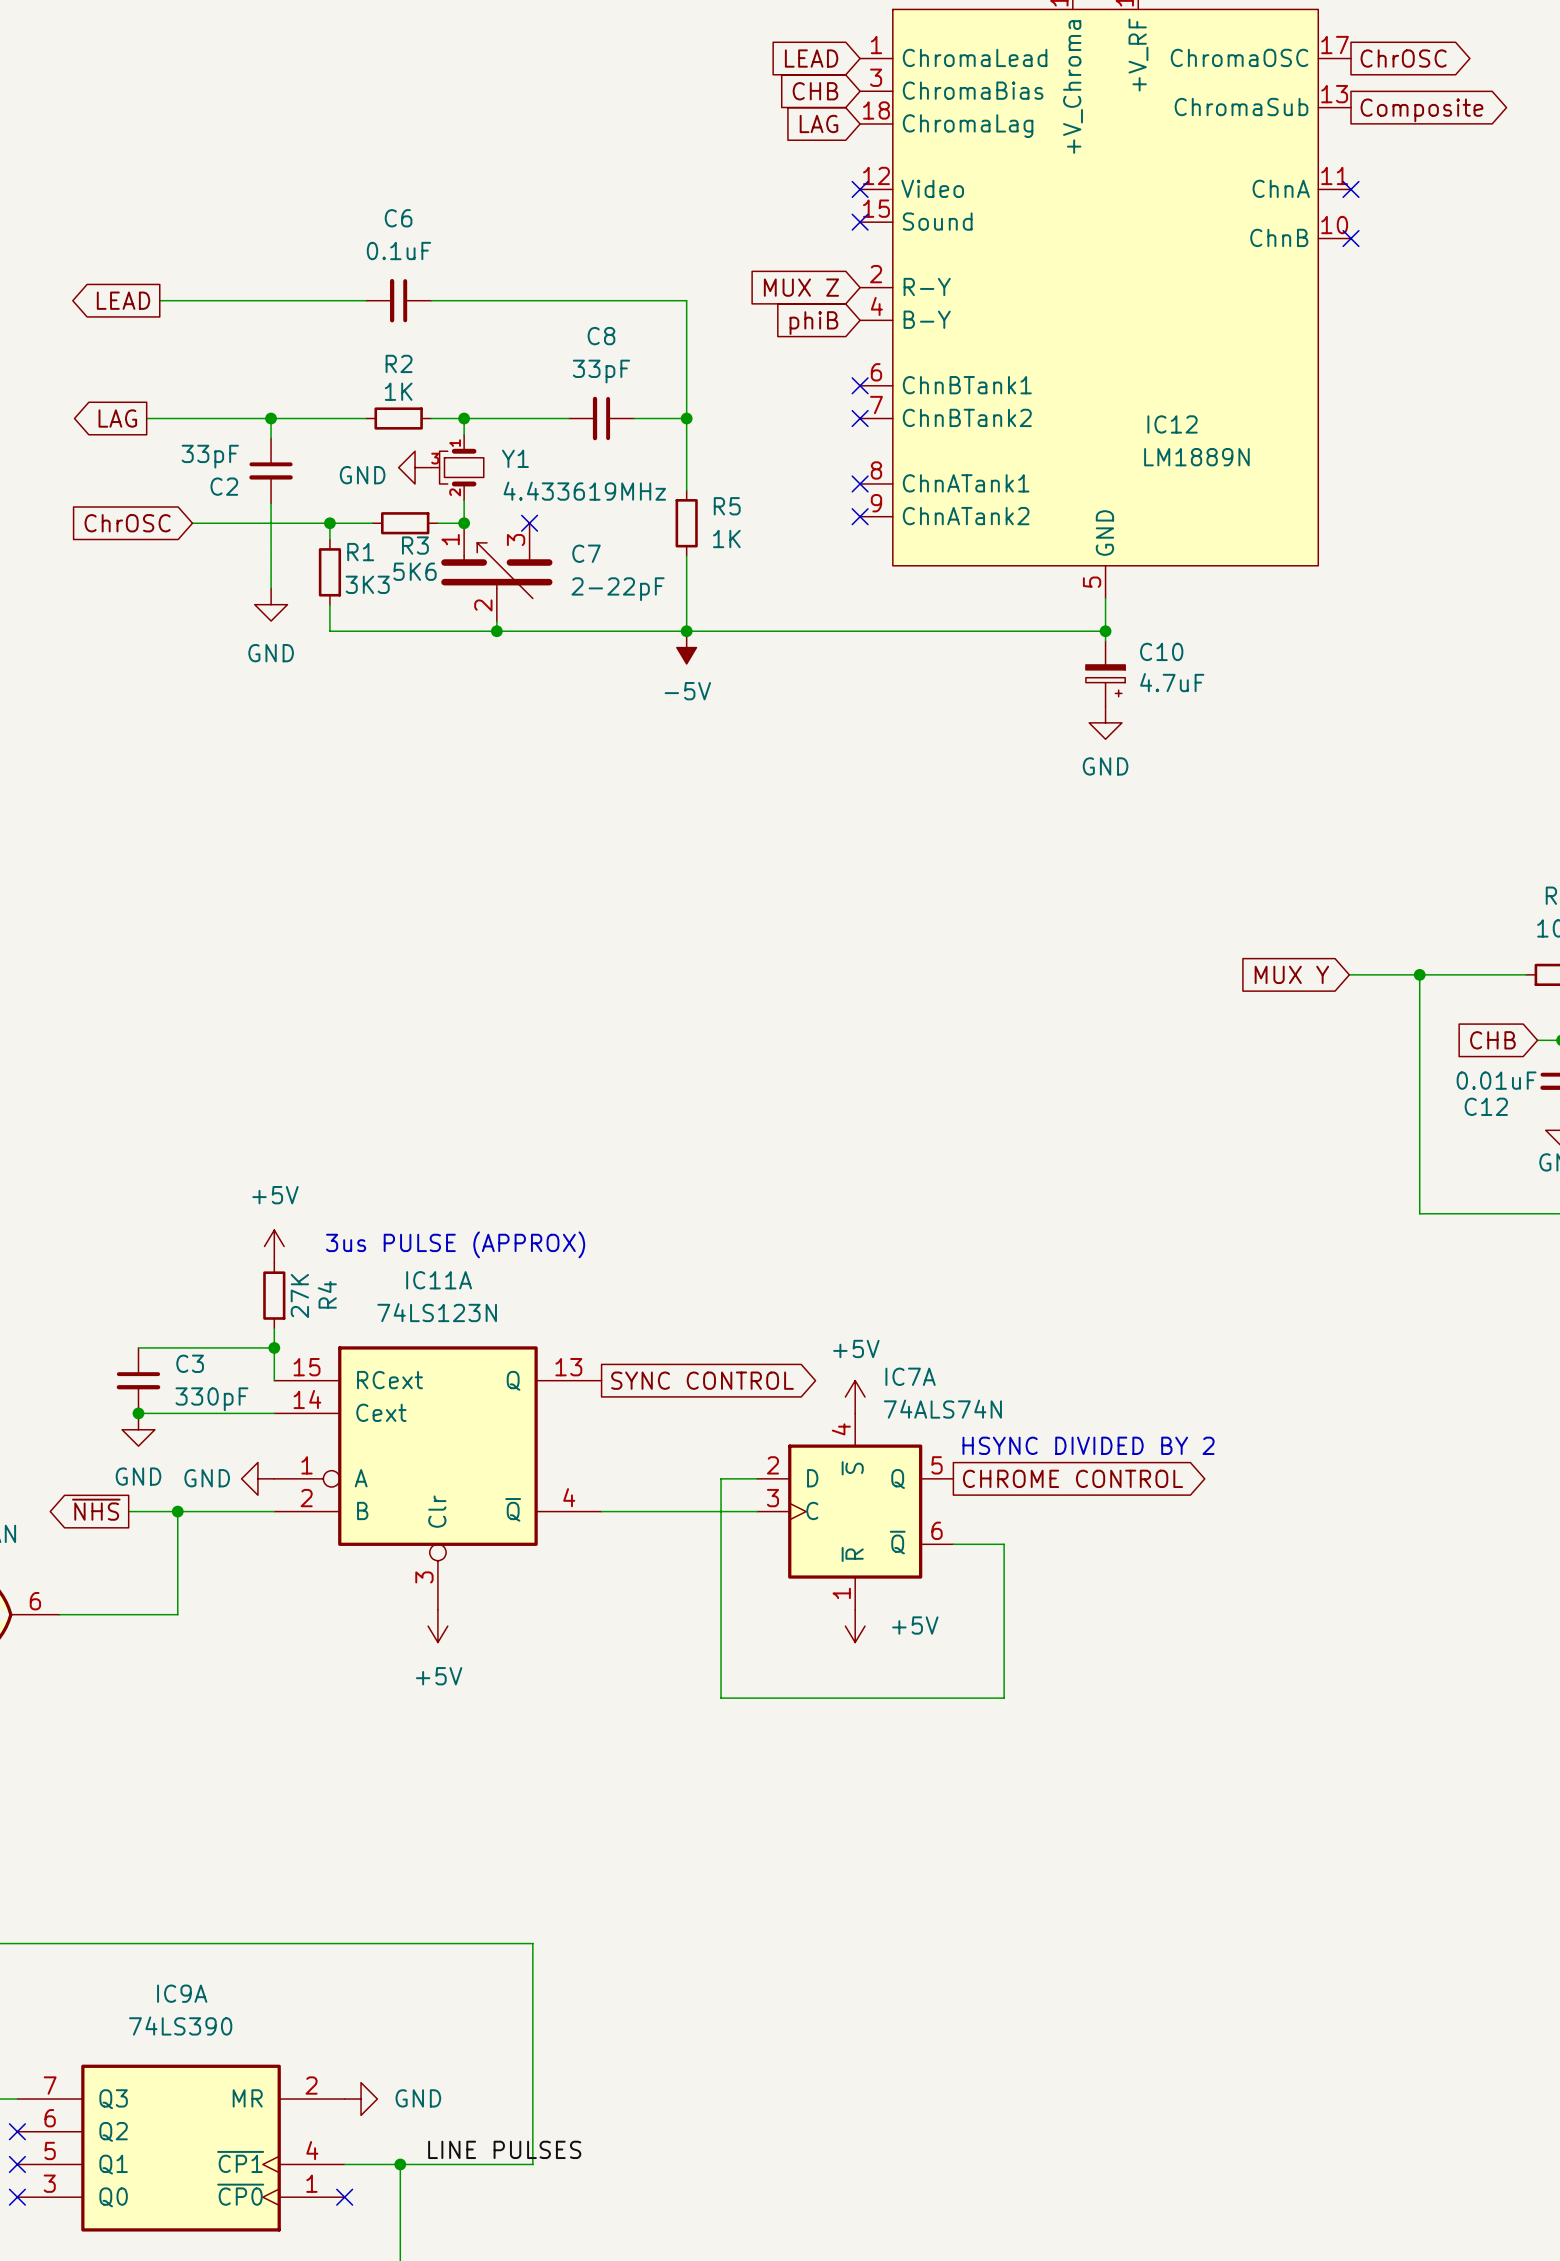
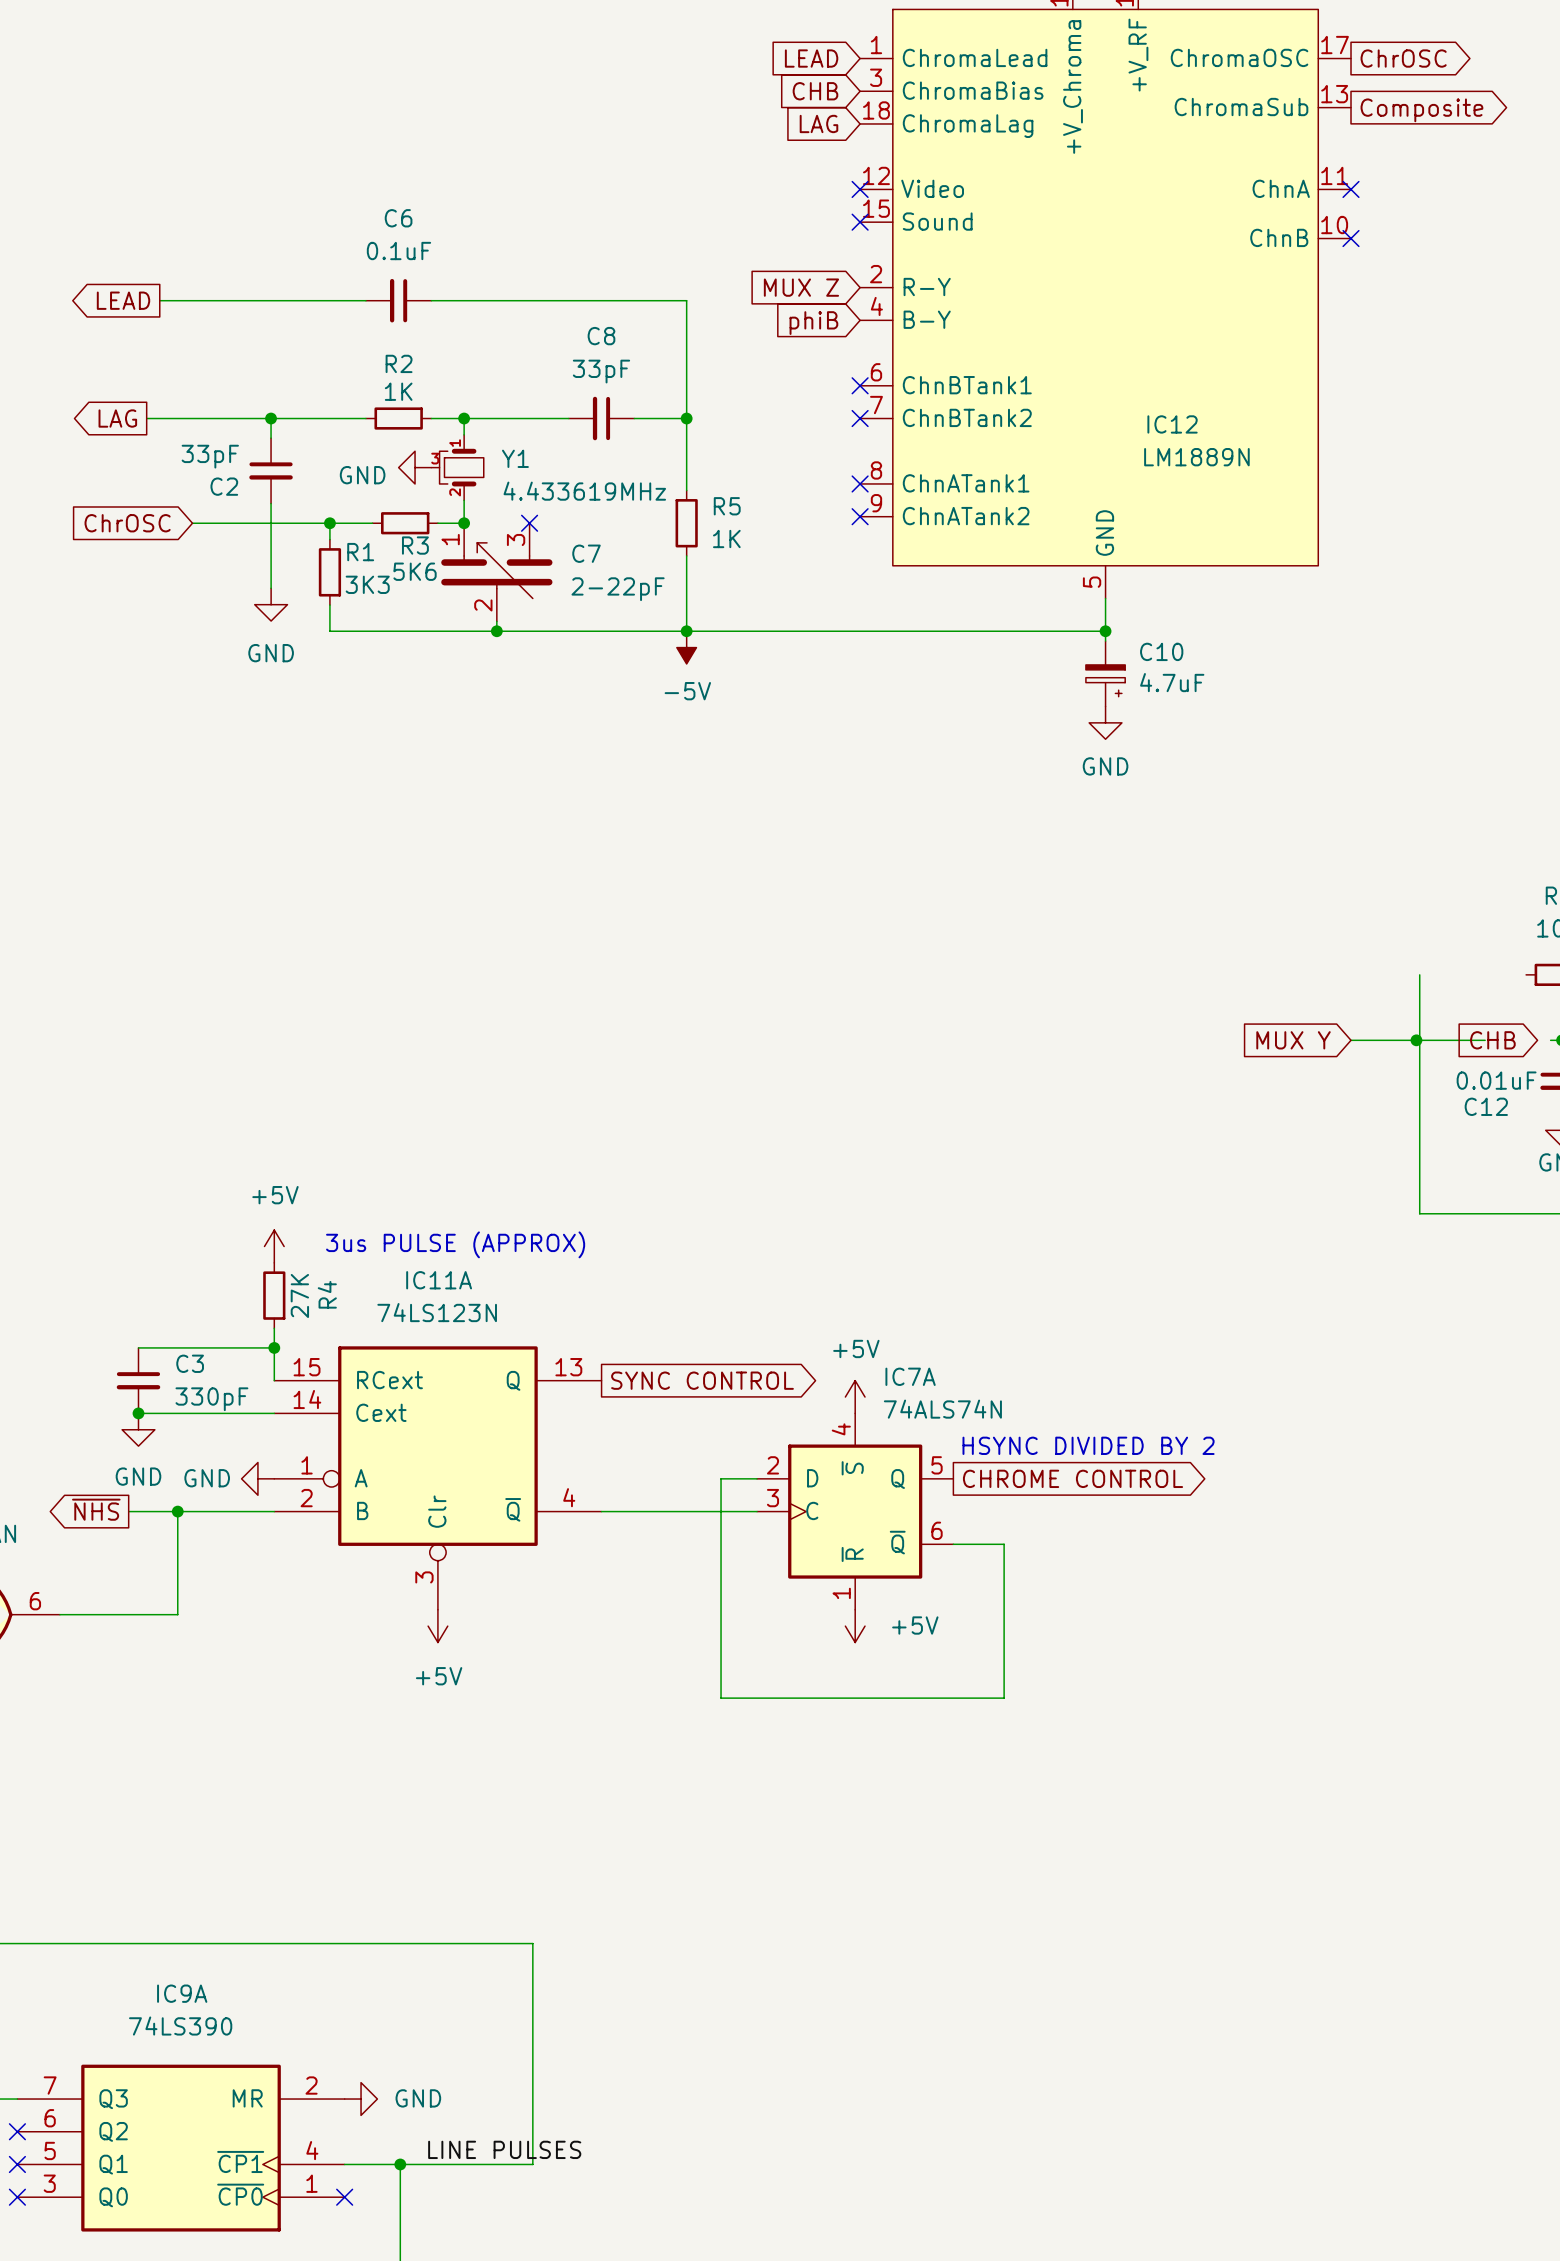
global label position: MUX Y (1291, 974) -> MUX Y (1293, 1040)
wire: (1349, 974) (1526, 974) -> none
junction position: (1419, 974) -> (1416, 1040)
wire: none -> (1351, 1040) (1485, 1040)
wire: (1537, 1040) (1550, 1040) -> none

